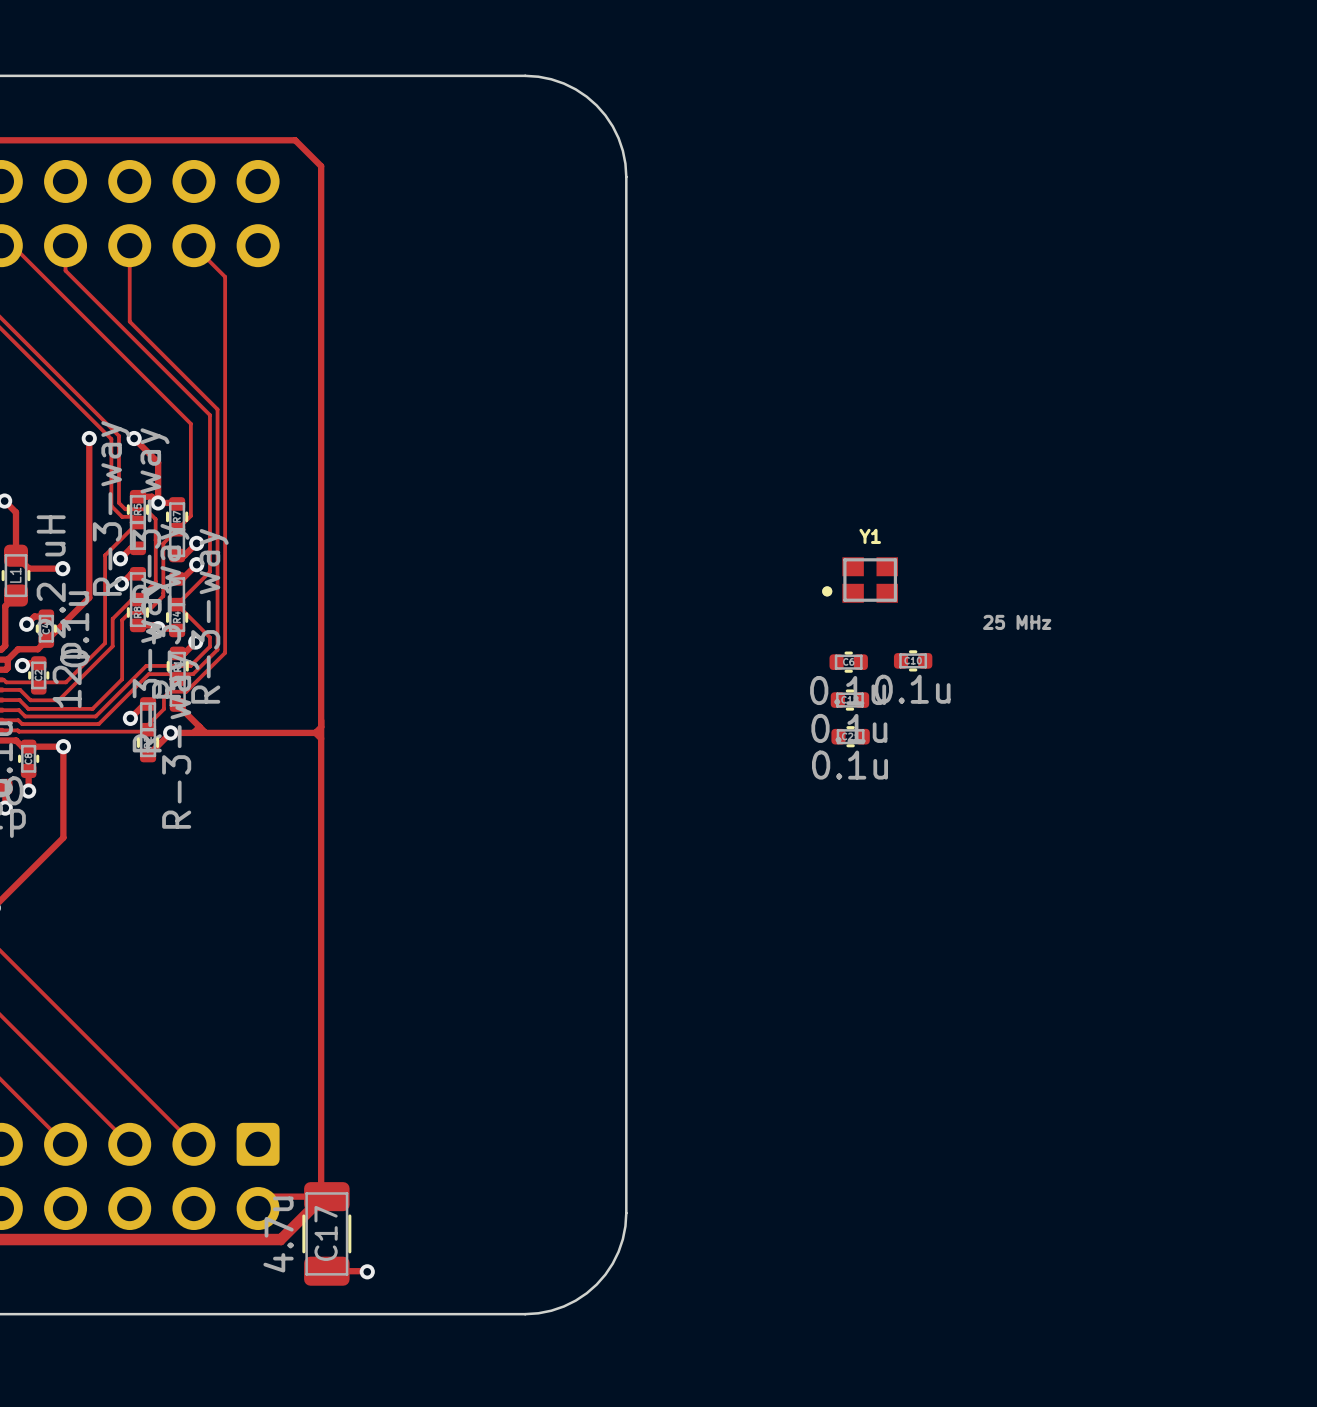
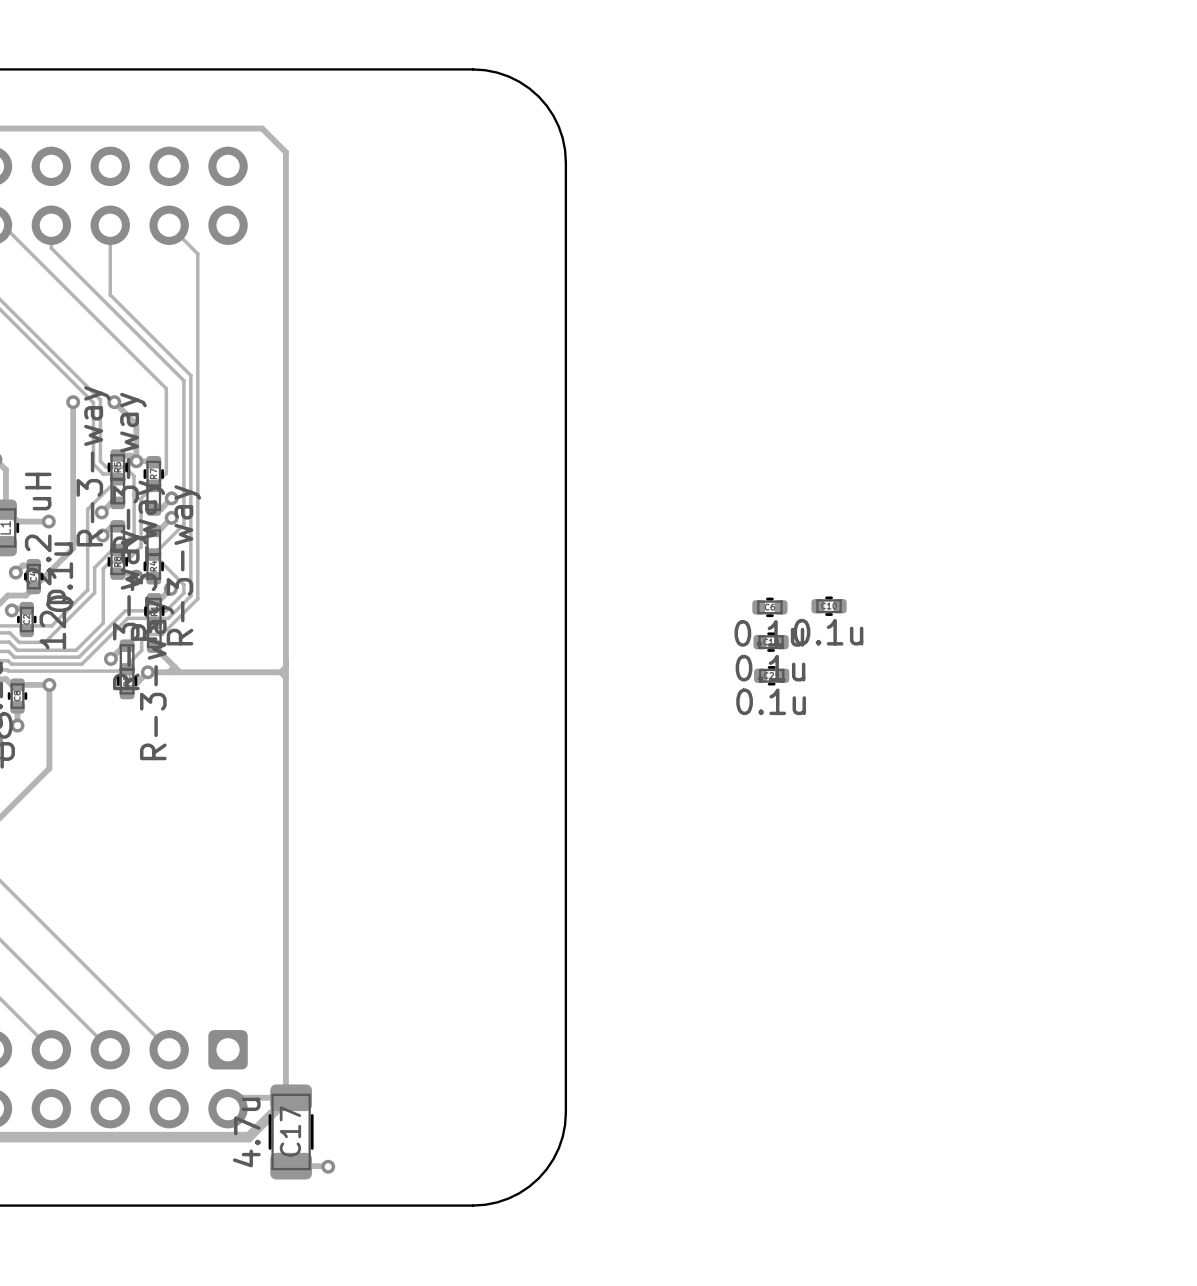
Y1: 25 MHz (860, 580) -> none

